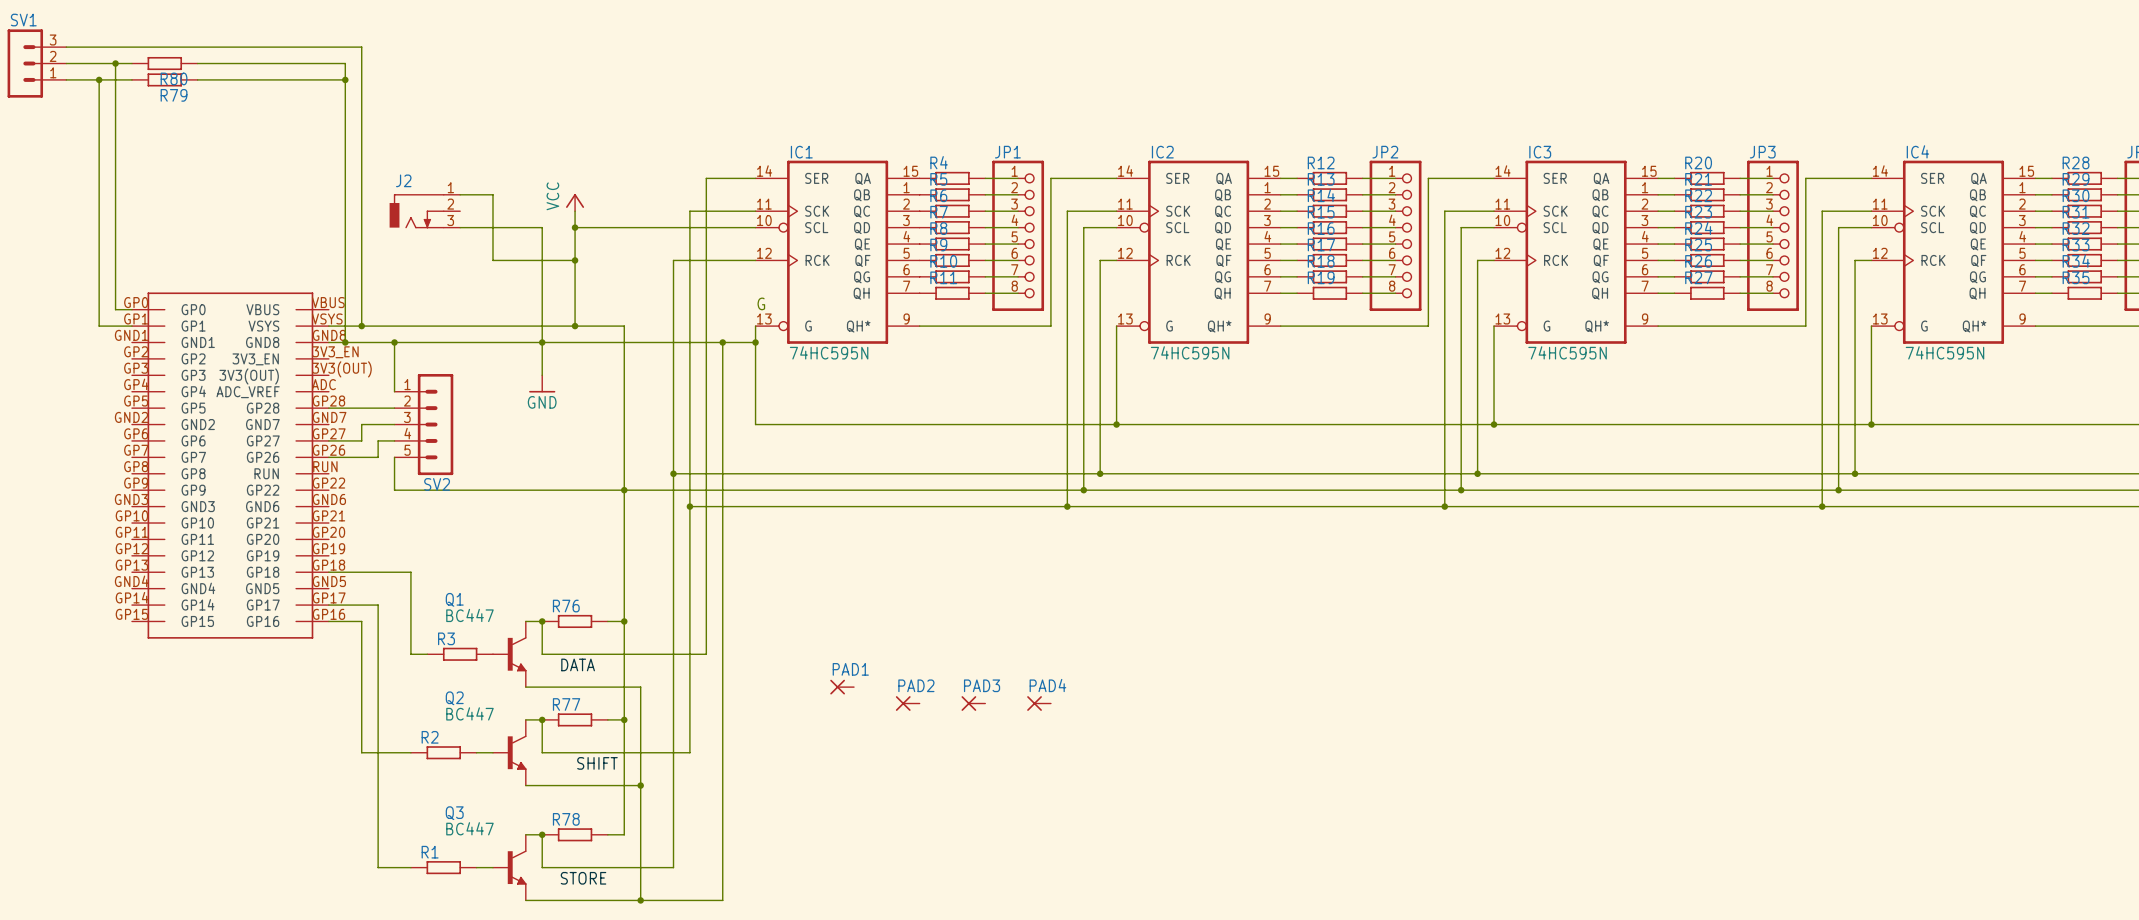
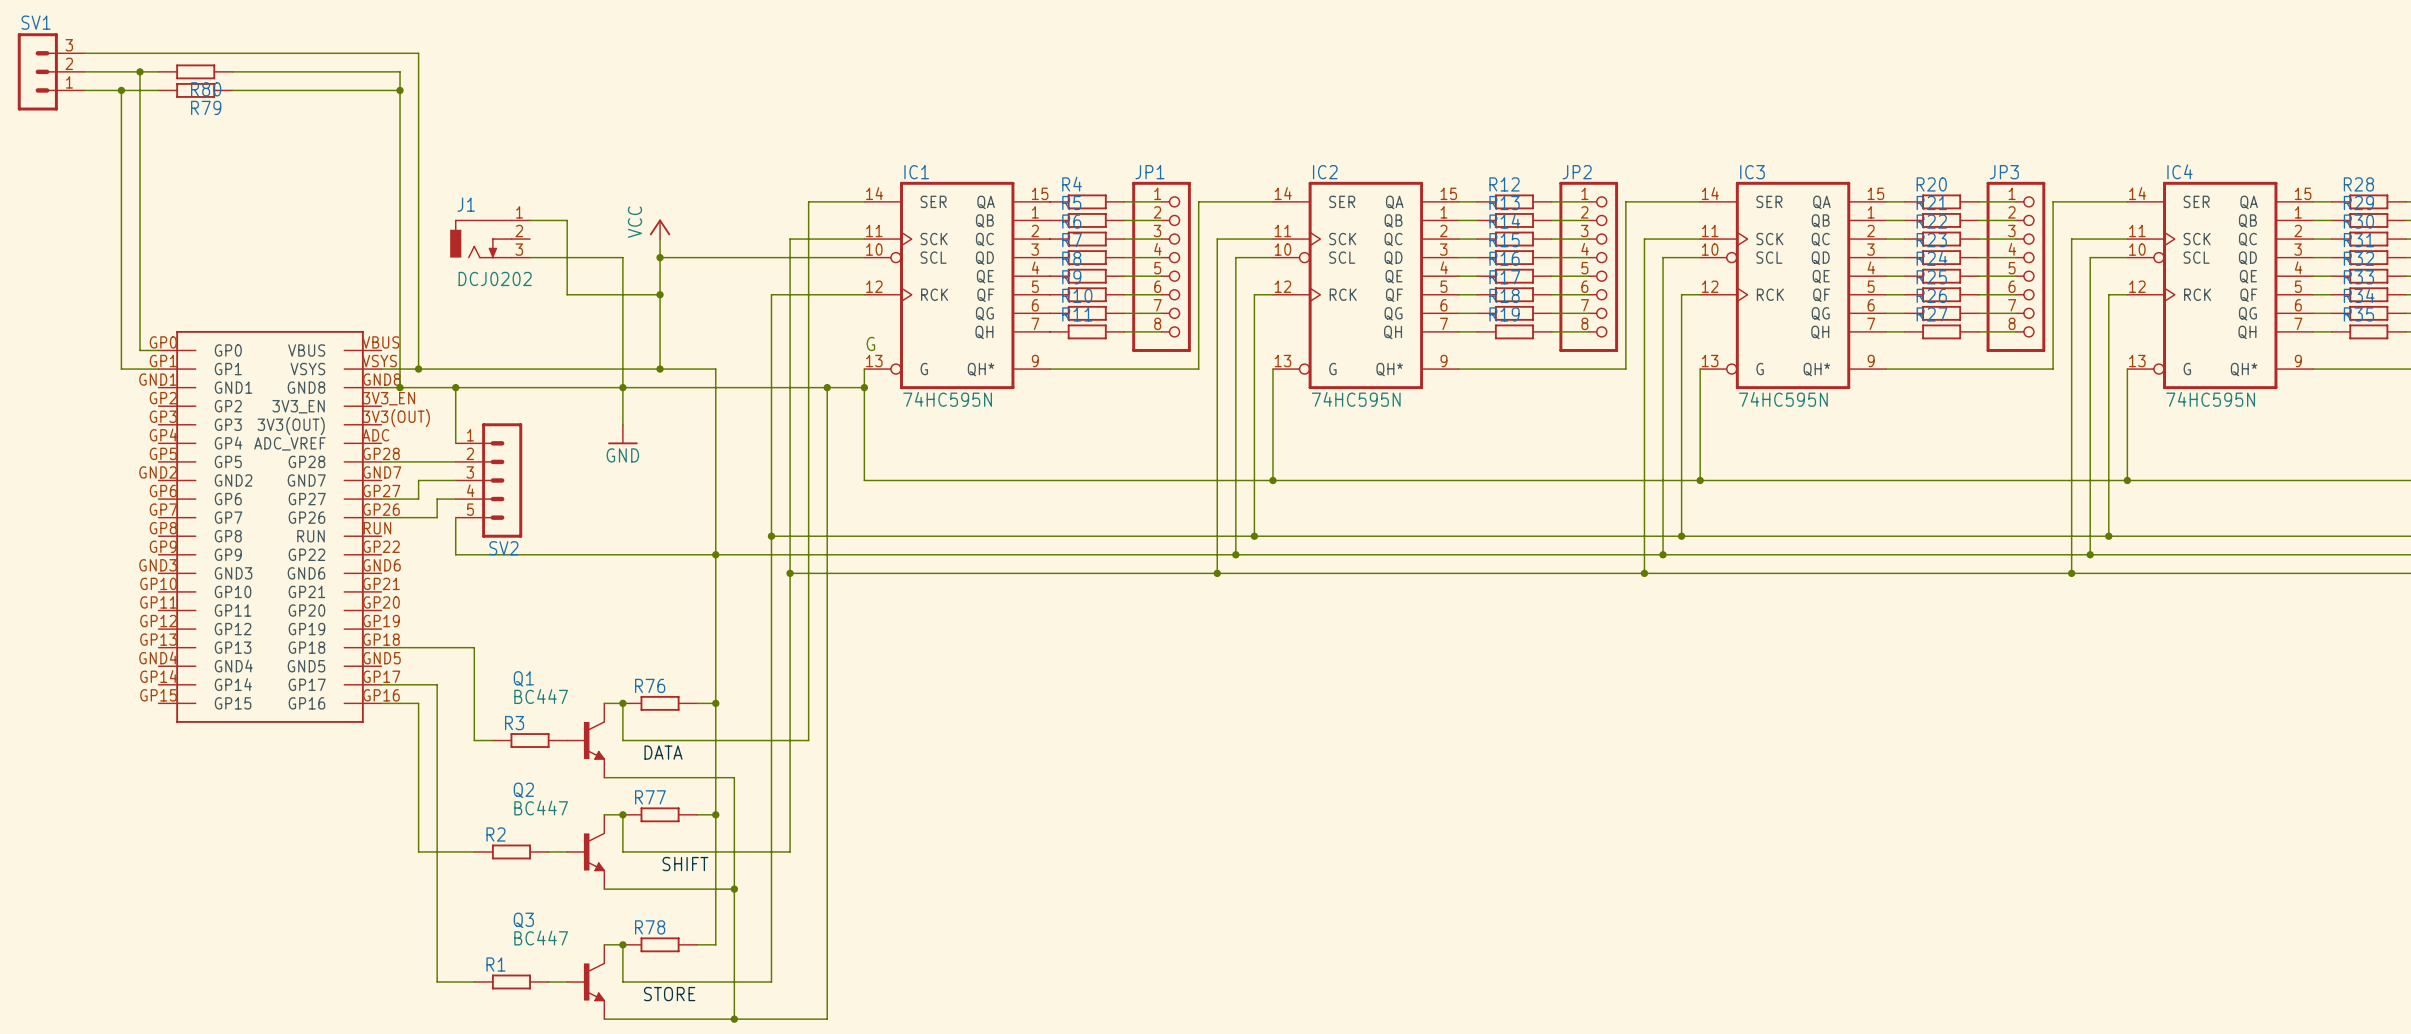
J2 name: J2 (403, 180) -> J1 (466, 204)
J2 value: none -> DCJ0202 (495, 278)
PAD1: (842, 687) -> none
PAD2: (907, 703) -> none
PAD3: (973, 703) -> none
PAD4: (1039, 703) -> none

